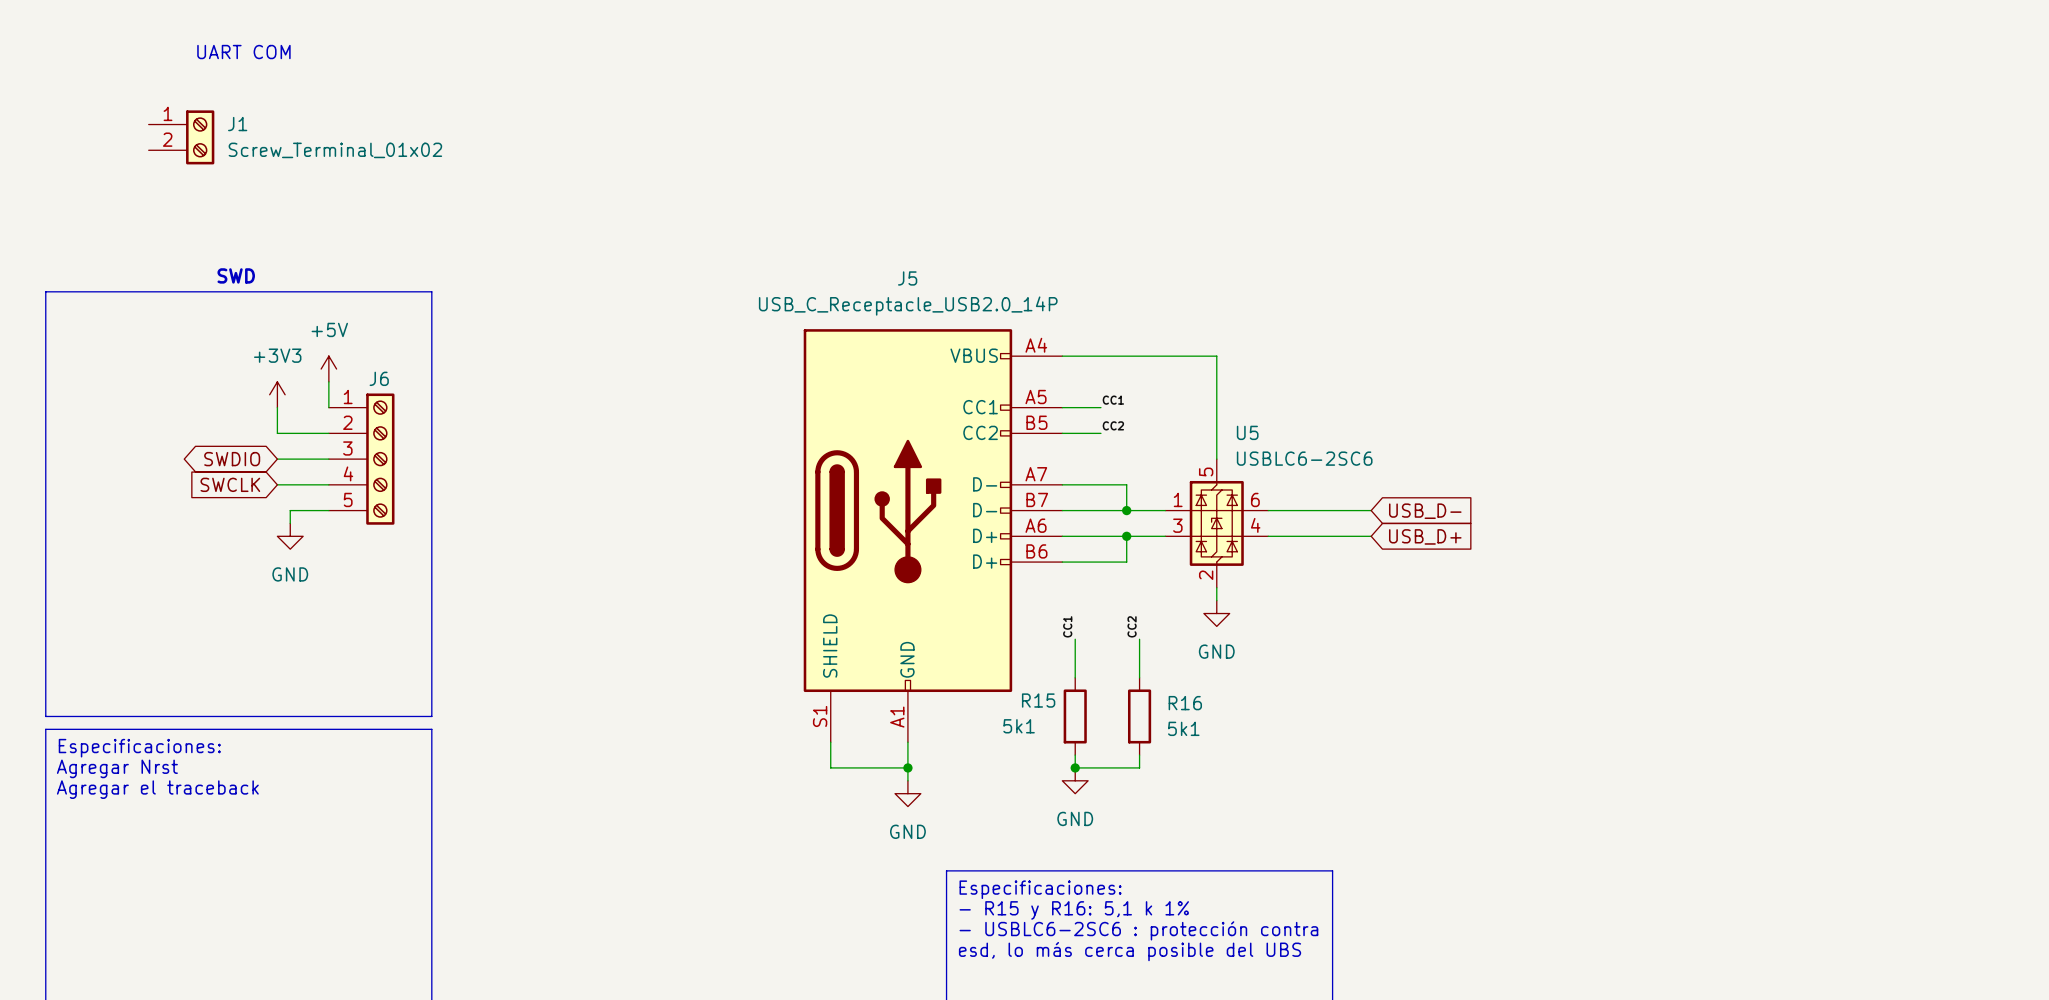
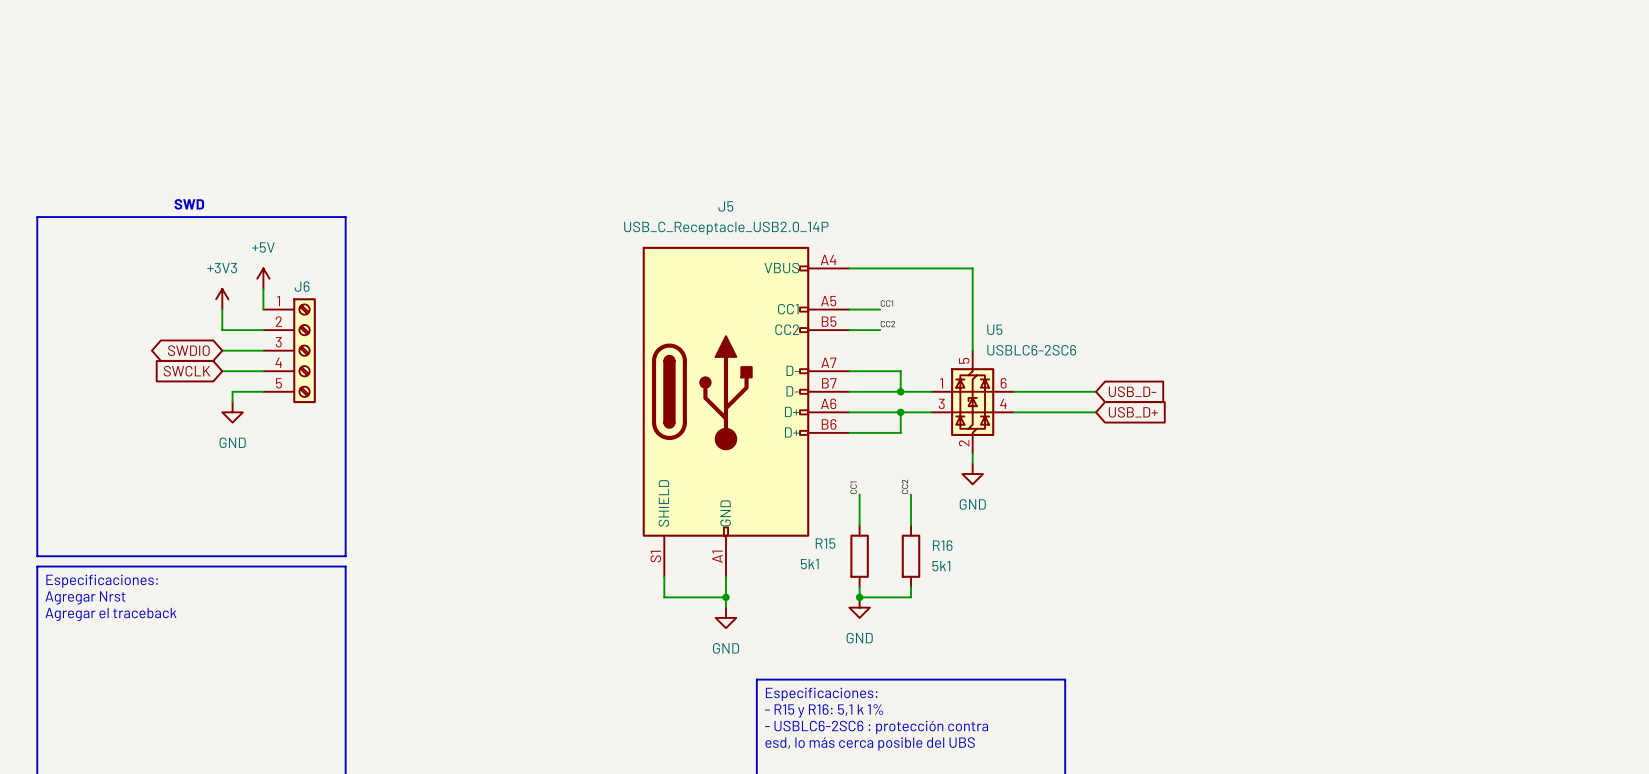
text: UART COM (243, 52) -> none
J1: Screw_Terminal_01x02 (181, 137) -> none

